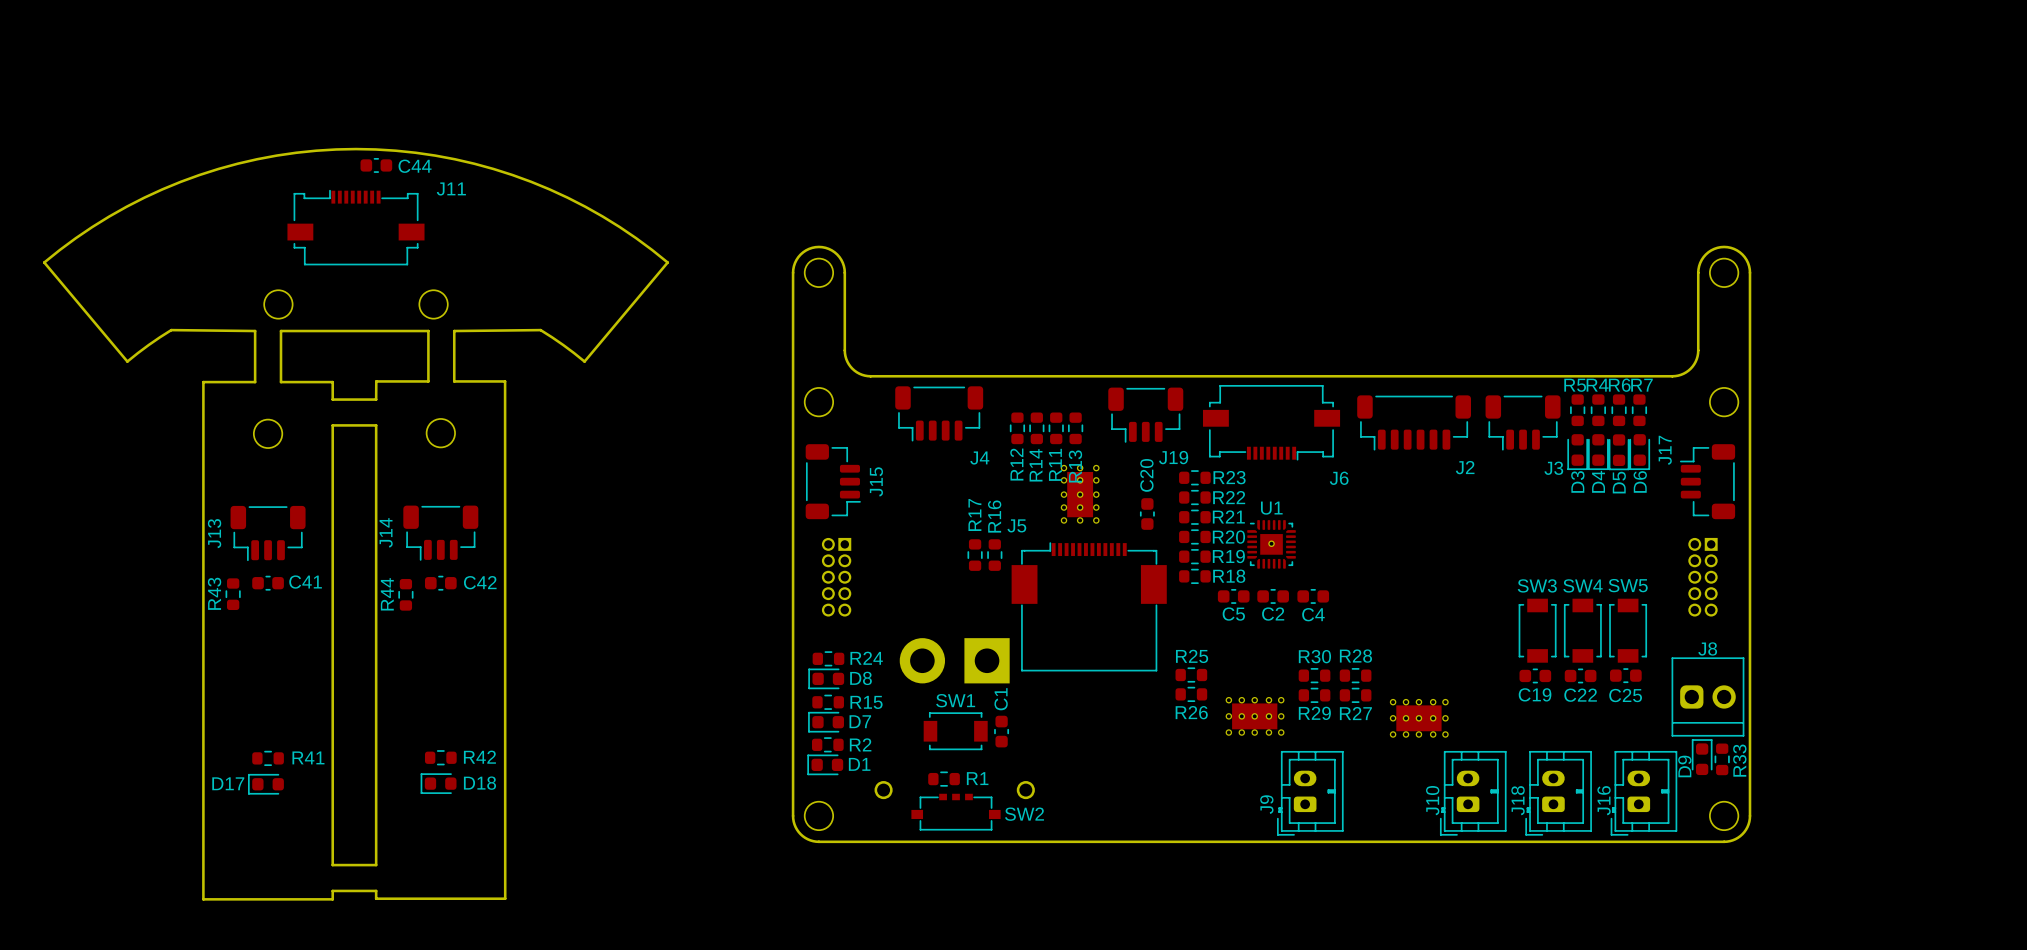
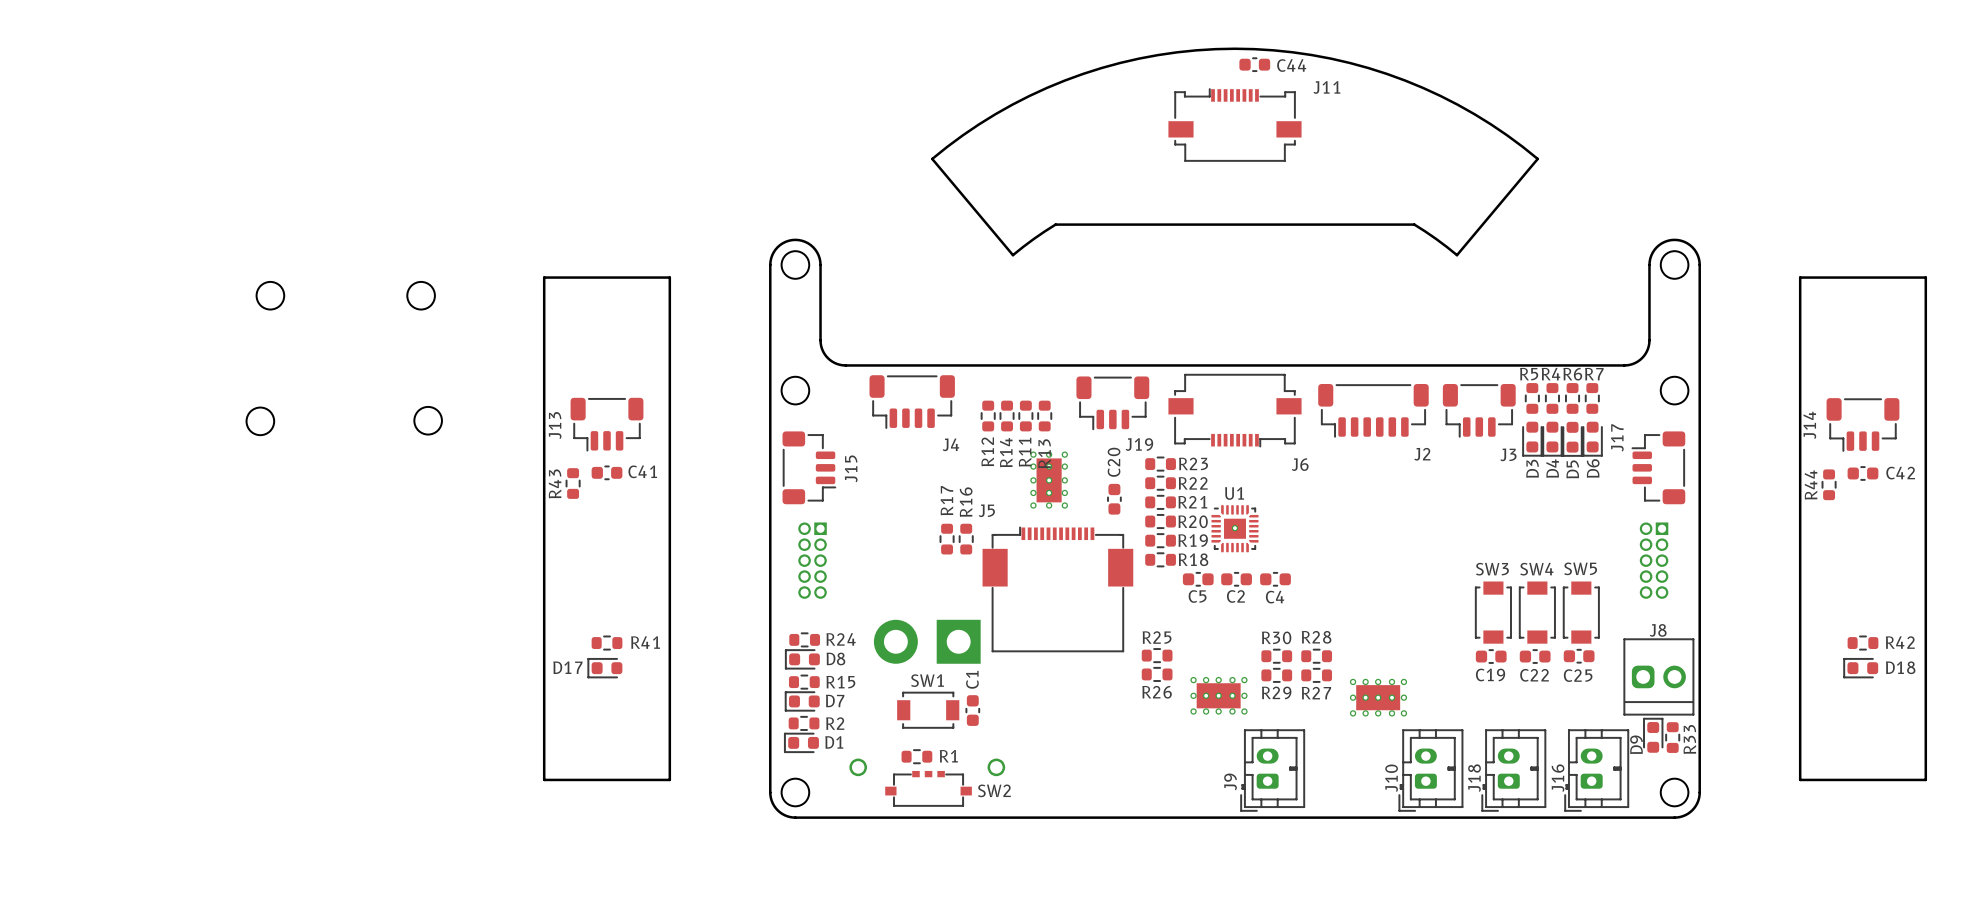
board edge: none -> (932, 158) (1012, 255) (1055, 224) (1414, 224) (1457, 255) (1537, 158) (1507, 135) (1457, 104) (1423, 87) (1386, 73) (1349, 62) (1312, 55) (1273, 50) (1234, 48) (1196, 50) (1157, 55) (1120, 62) (1083, 73) (1046, 87) (1012, 104) (962, 135) (932, 158)
C44 position: (376, 165) -> (1254, 64)
J11 position: (355, 227) -> (1234, 125)
board edge: (44, 262) (127, 361) (171, 330) (255, 331) (255, 382) (203, 382) (203, 899) (332, 899) (332, 890) (376, 890) (376, 898) (505, 898) (505, 381) (454, 381) (454, 331) (540, 330) (584, 361) (667, 262) (636, 238) (602, 216) (567, 197) (512, 175) (474, 163) (435, 155) (395, 150) (355, 149) (316, 150) (276, 155) (237, 163) (199, 175) (162, 189) (126, 206) (92, 227) (44, 262) -> none
board edge: none -> (544, 277) (544, 779) (669, 779) (669, 277) (544, 277)
board edge: none -> (1800, 277) (1925, 277) (1925, 779) (1800, 779) (1800, 277)
board edge: (280, 331) (280, 382) (332, 382) (332, 399) (376, 399) (376, 381) (428, 381) (428, 331) (280, 331) -> none
board edge: (332, 425) (376, 425) (376, 865) (332, 865) (332, 425) -> none
J13 position: (268, 533) -> (607, 424)
J14 position: (440, 533) -> (1862, 424)
C41 position: (268, 583) -> (607, 472)
C42 position: (440, 583) -> (1862, 473)
R43 position: (233, 594) -> (573, 483)
R44 position: (405, 594) -> (1829, 484)
R42 position: (440, 757) -> (1862, 643)
R41 position: (268, 758) -> (607, 643)
D18 position: (438, 783) -> (1860, 668)
D17 position: (265, 784) -> (605, 668)

